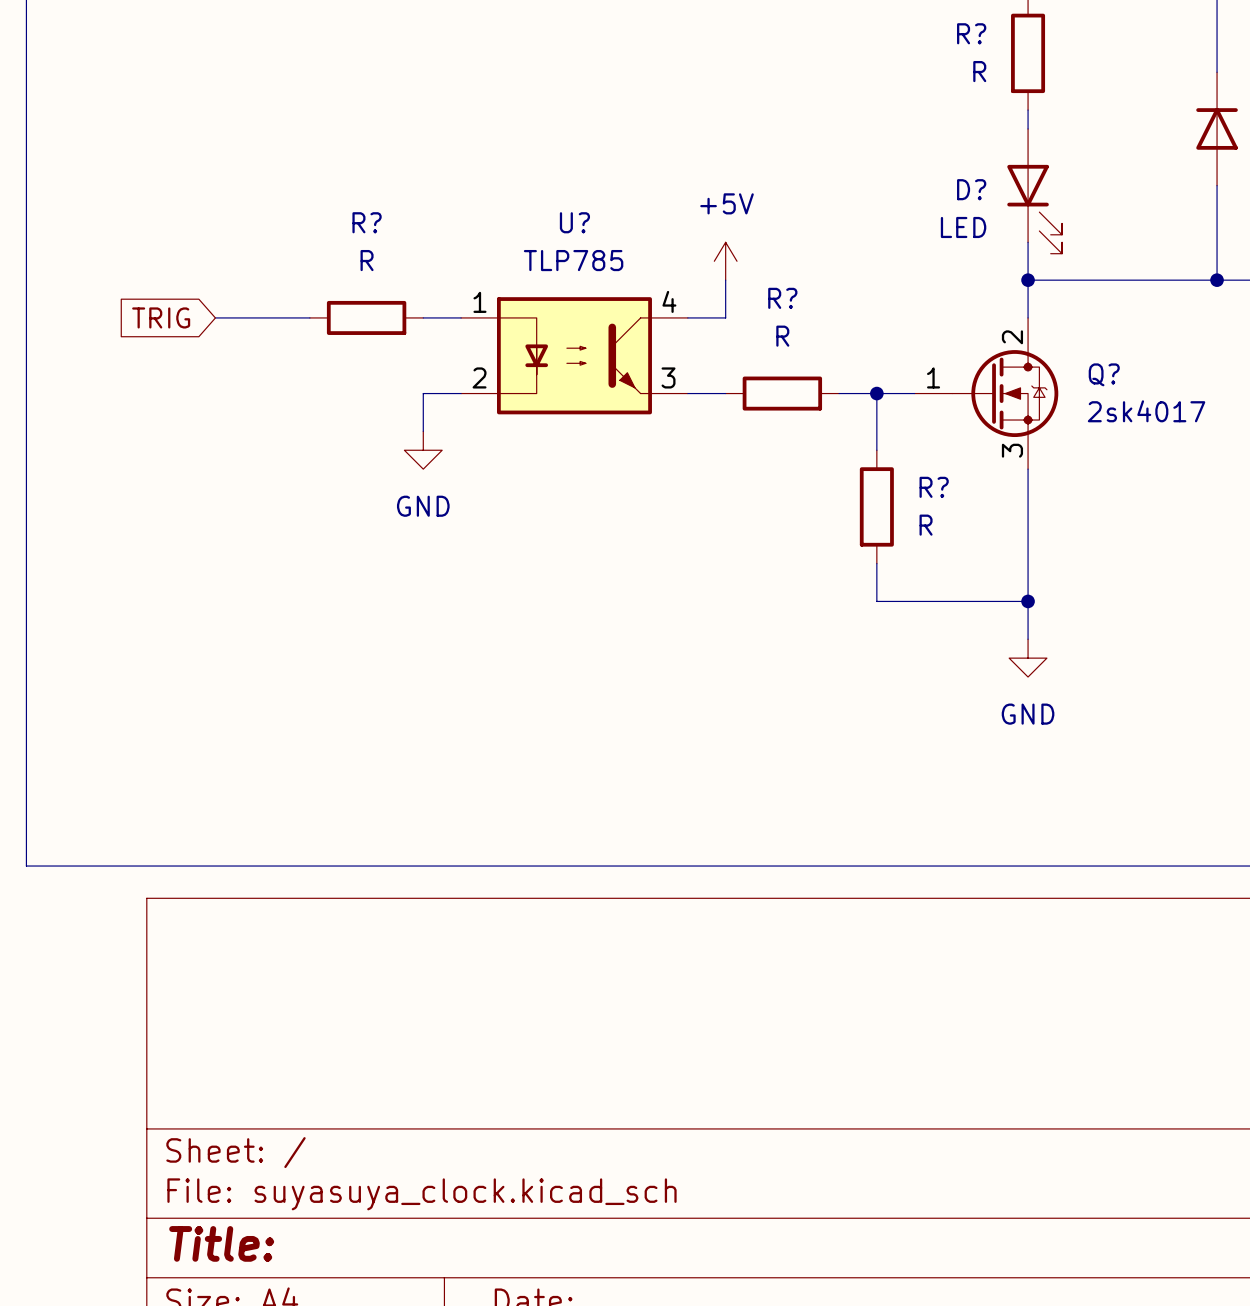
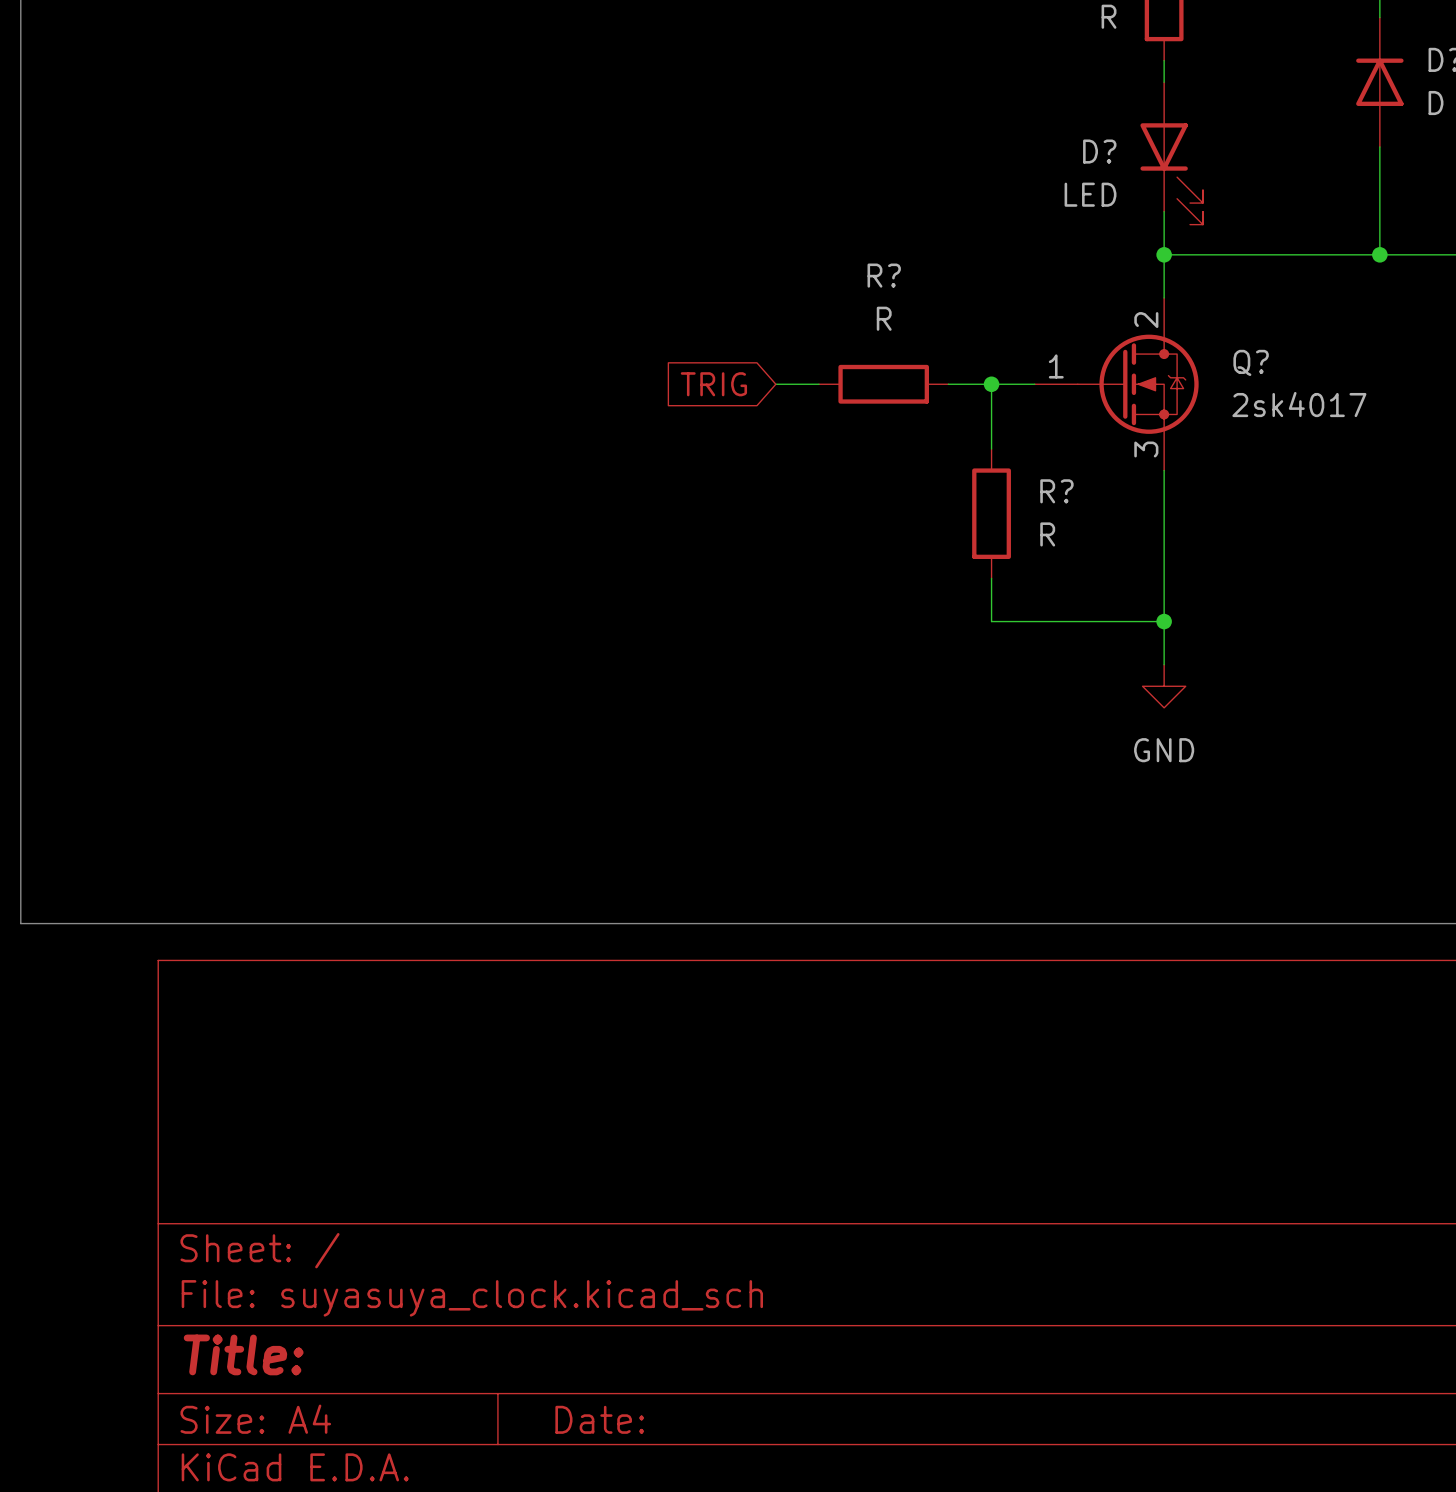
power symbol: +5V (725, 261) -> none
wire: (725, 280) (725, 317) (687, 317) -> none
global label: TRIG (161, 317) -> none
wire: (215, 317) (309, 317) -> none
R?: R (366, 317) -> none
wire: (423, 317) (461, 317) -> none
U?: TLP785 (574, 355) -> none
wire: (461, 393) (423, 393) (423, 431) -> none
global label: none -> TRIG (713, 384)
power symbol: GND (423, 450) -> none

